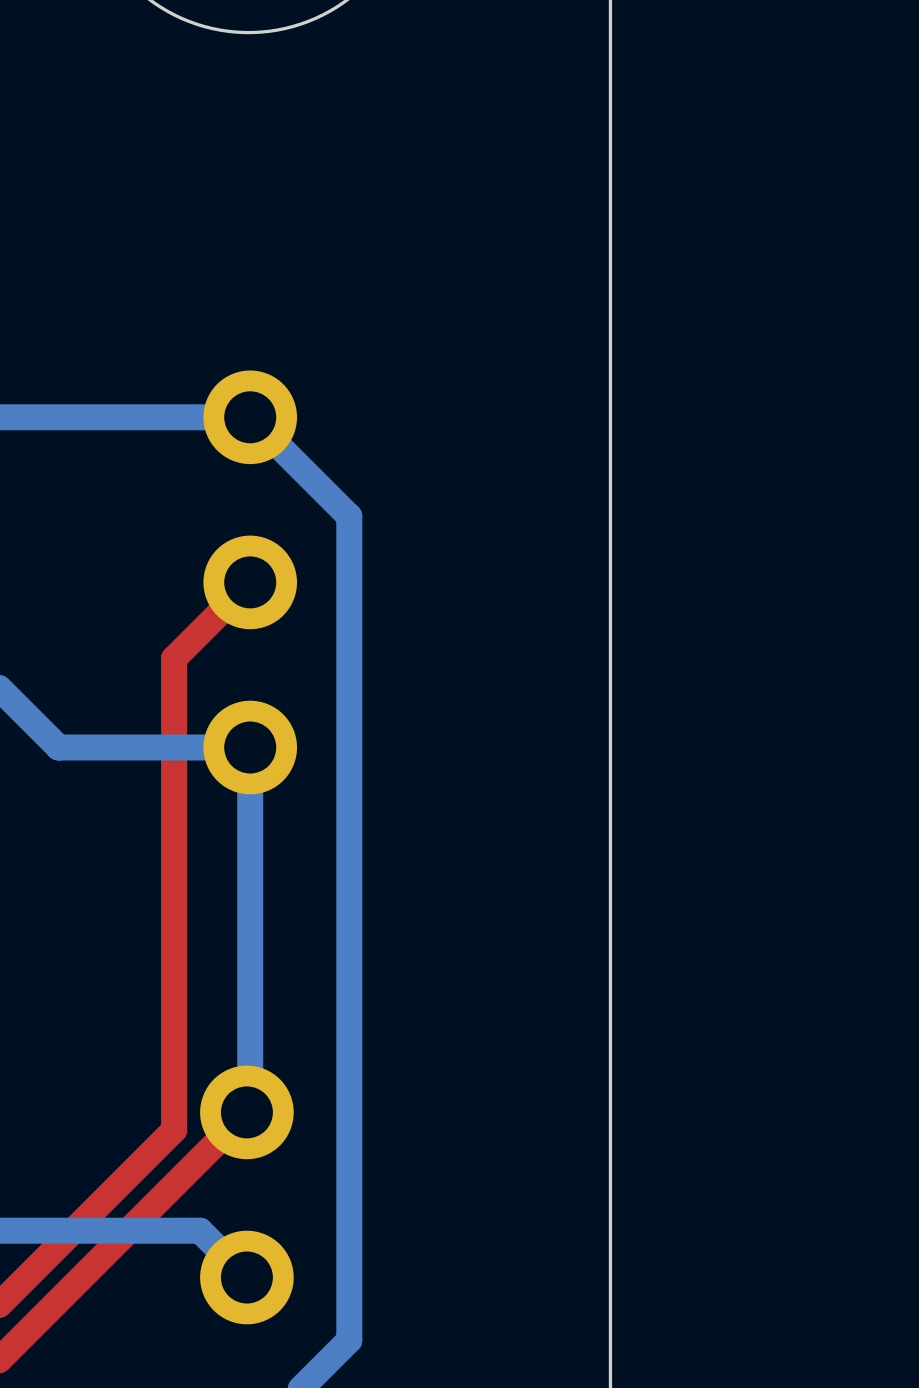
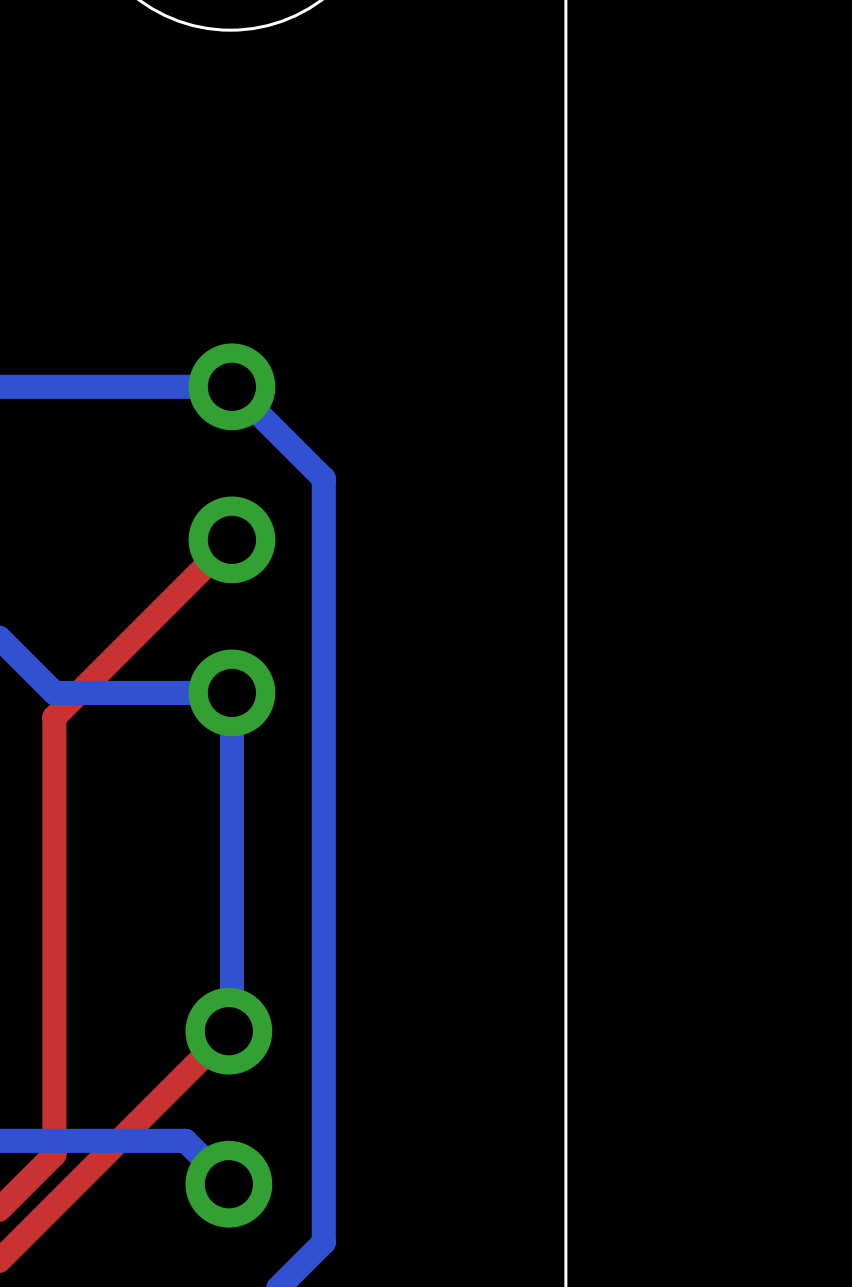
top track: (174, 658) (174, 1130) (58, 1245) -> (161, 610) (54, 717) (54, 1154)

